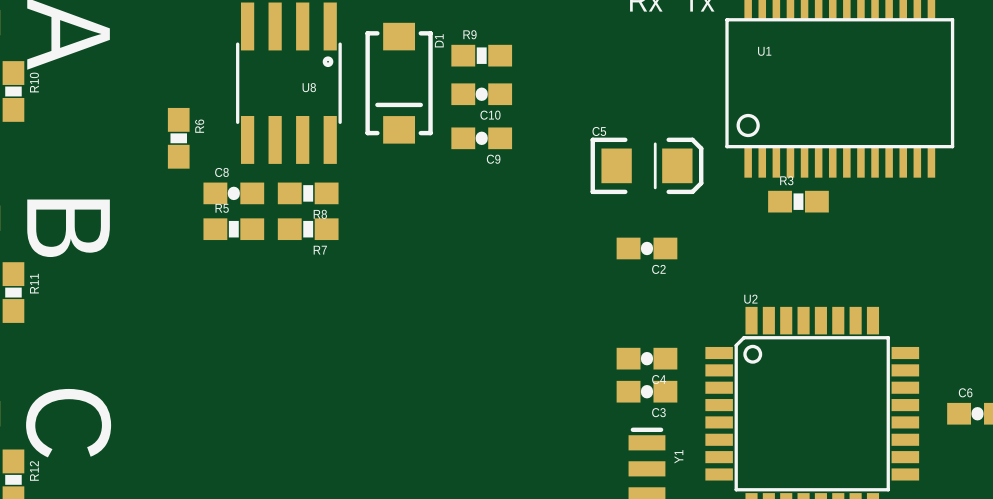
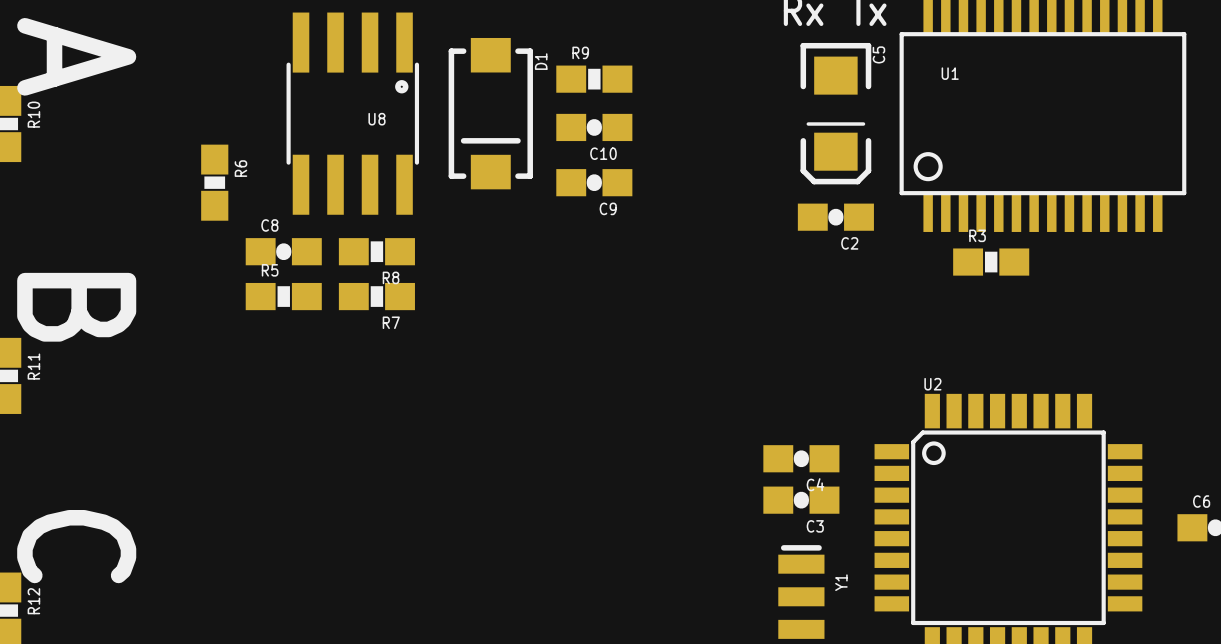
C5 rotation: 0° (646, 165) -> 90° clockwise (835, 113)
C5 position: (646, 165) -> (835, 113)
C2 position: (646, 248) -> (835, 217)

